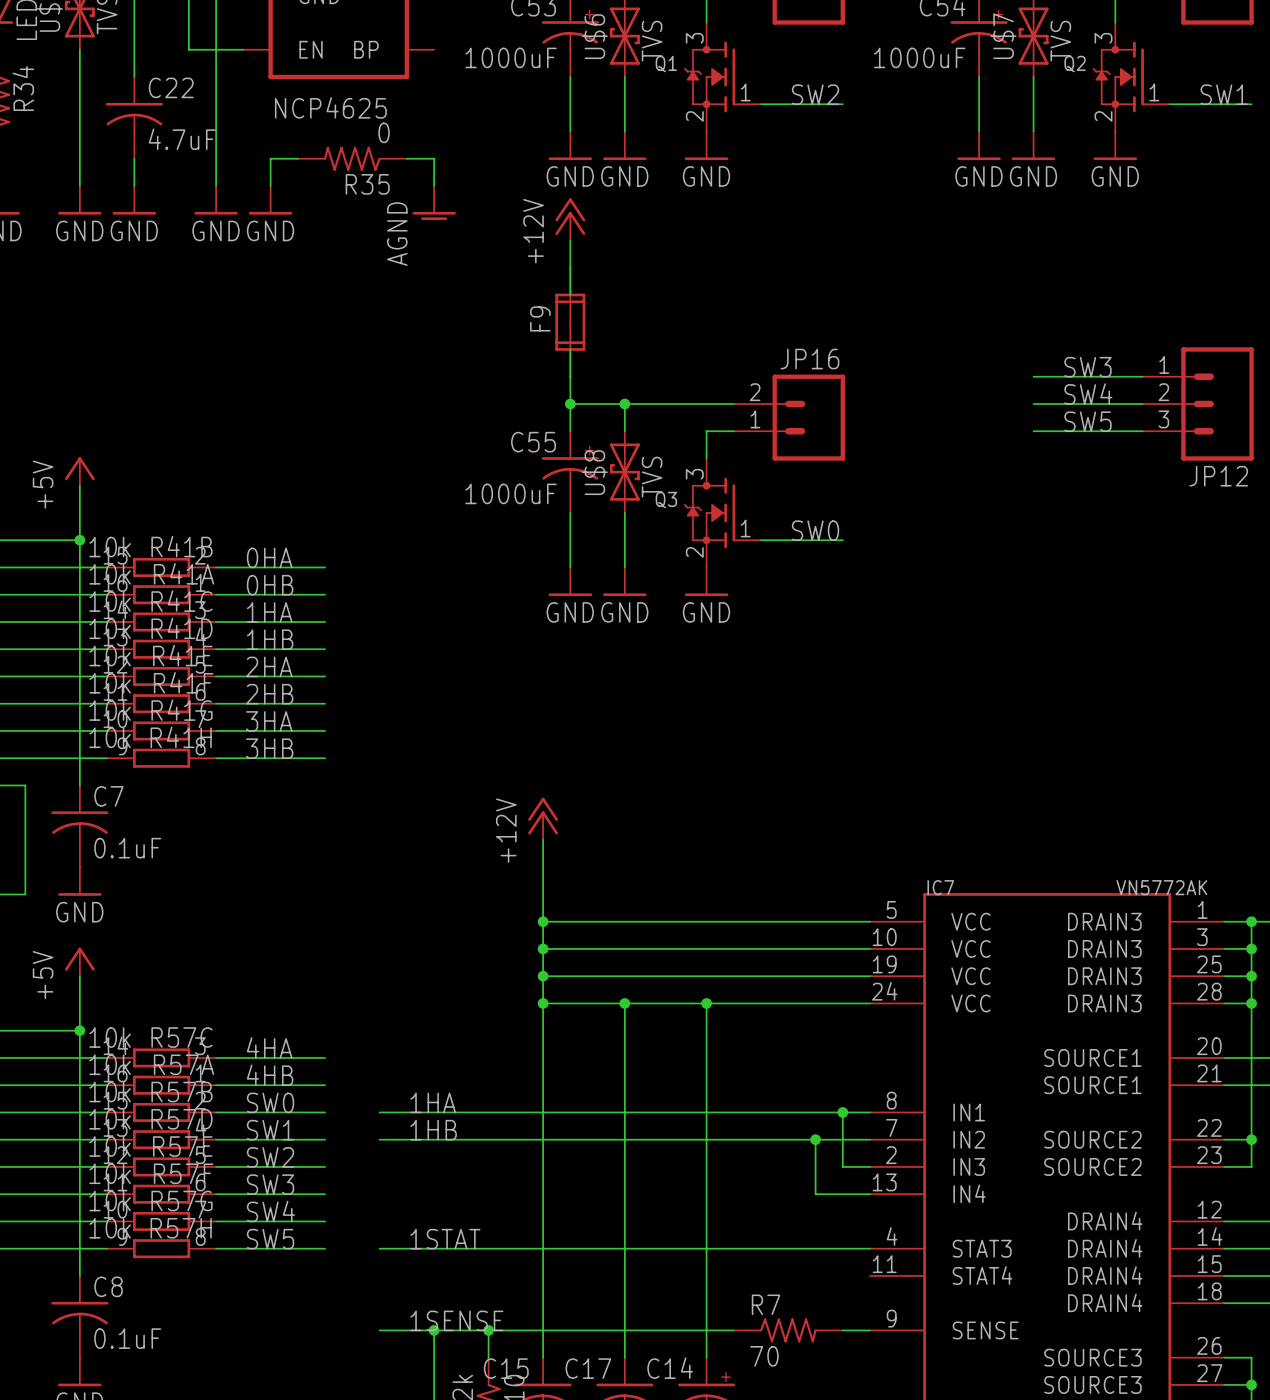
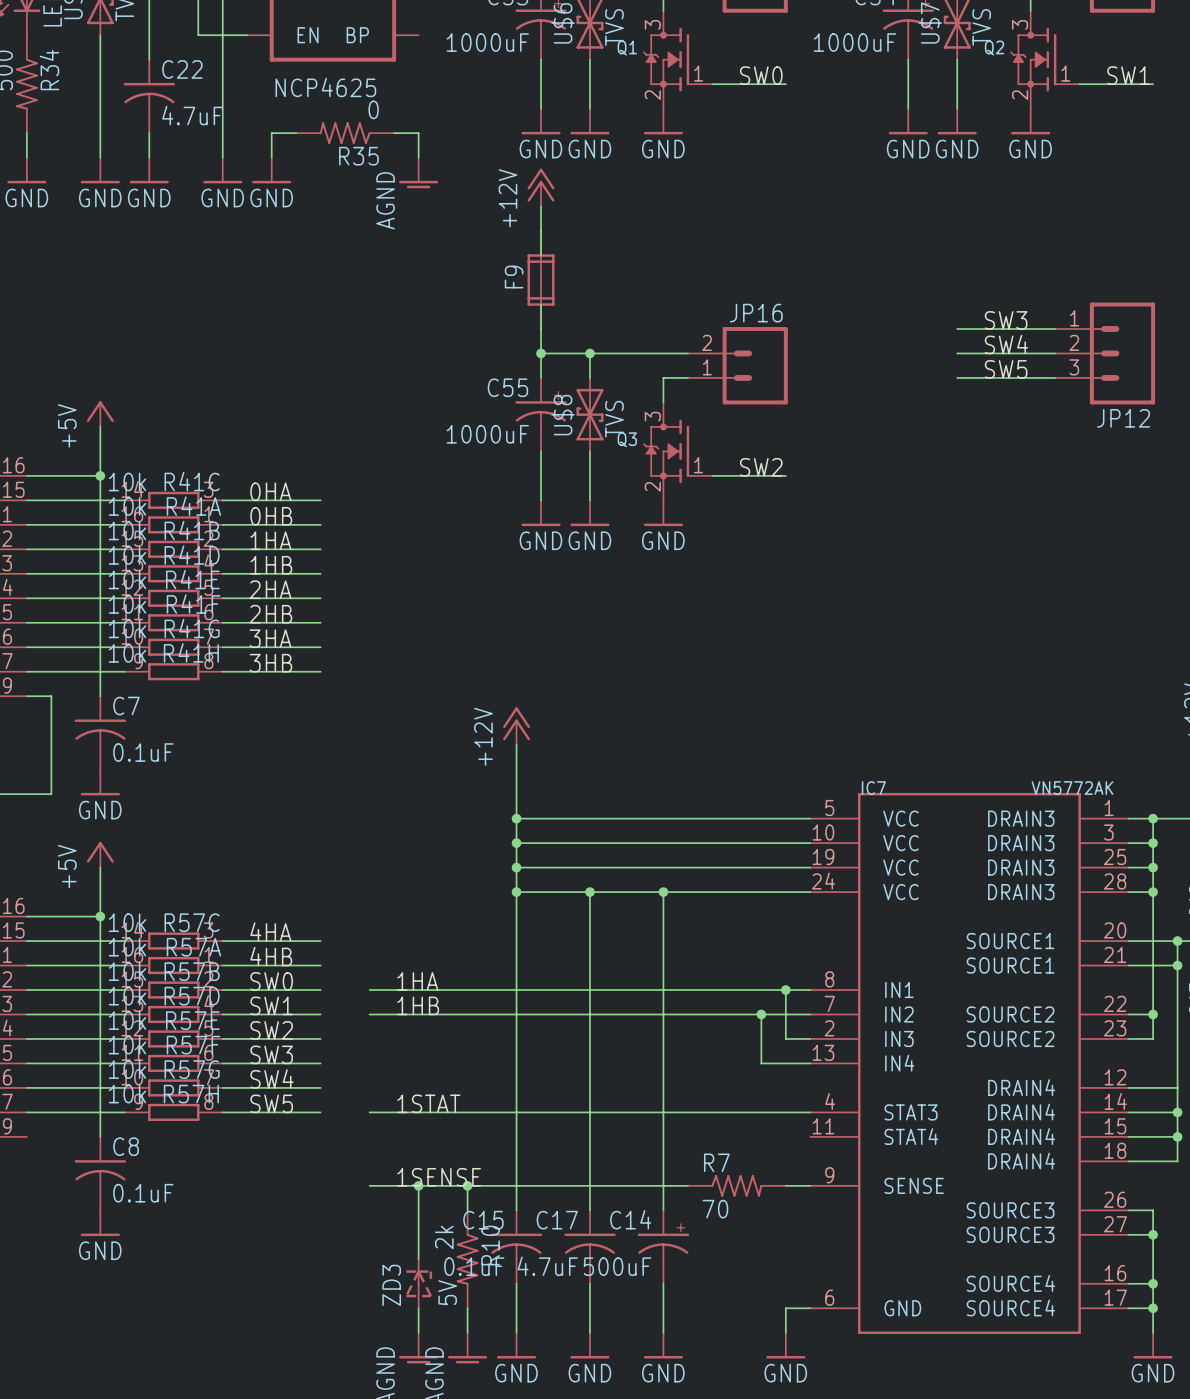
label: SW2 (815, 94) -> SW0 (761, 75)
label: SW0 (815, 530) -> SW2 (761, 467)
R41B position: (161, 567) -> (173, 549)
R41C position: (161, 621) -> (173, 500)

